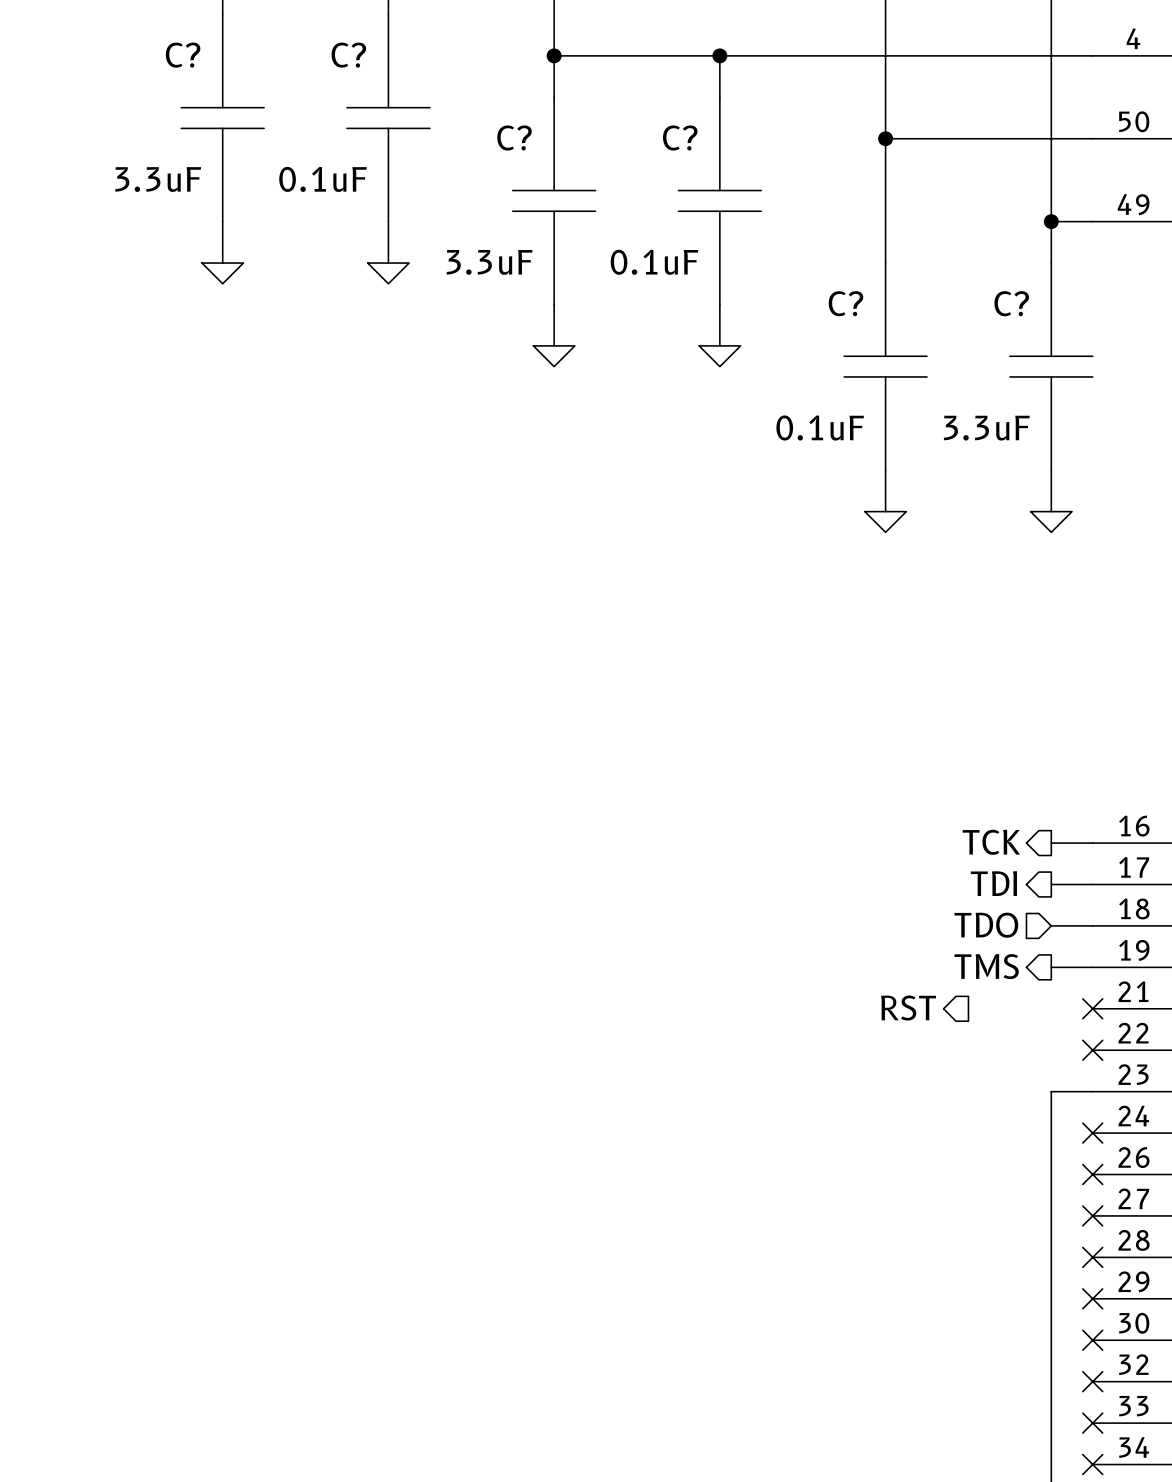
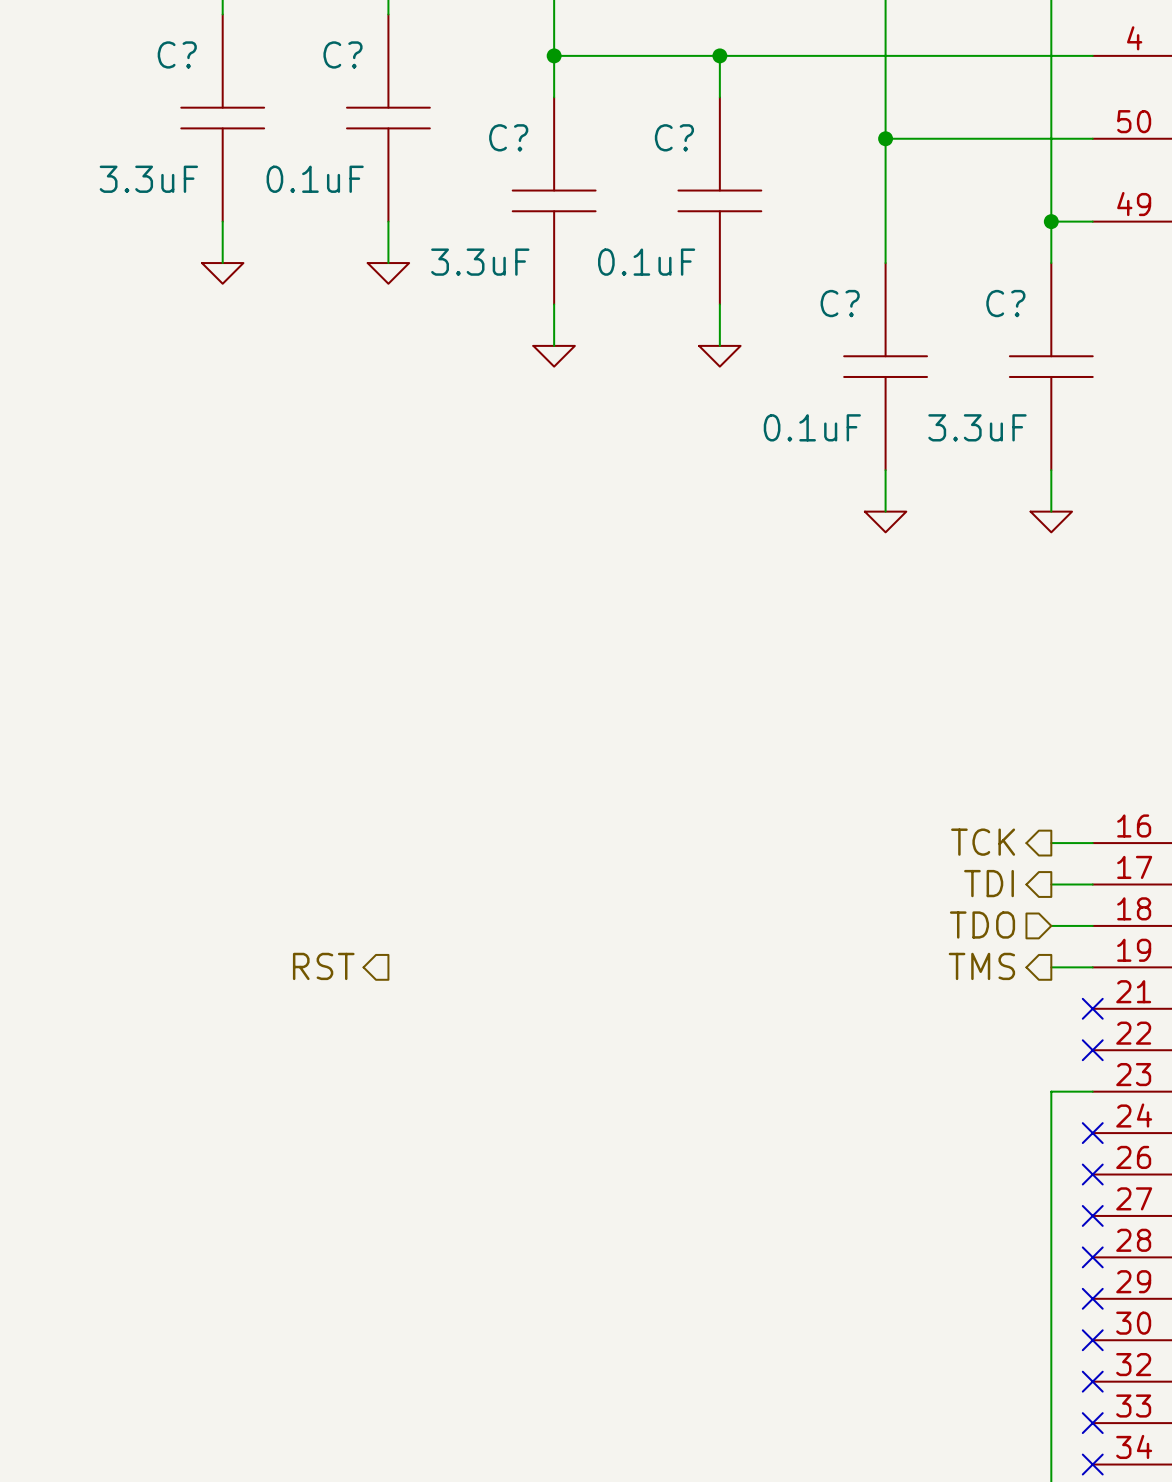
hierarchical label: none -> RST (323, 966)
hierarchical label: RST (908, 1008) -> none

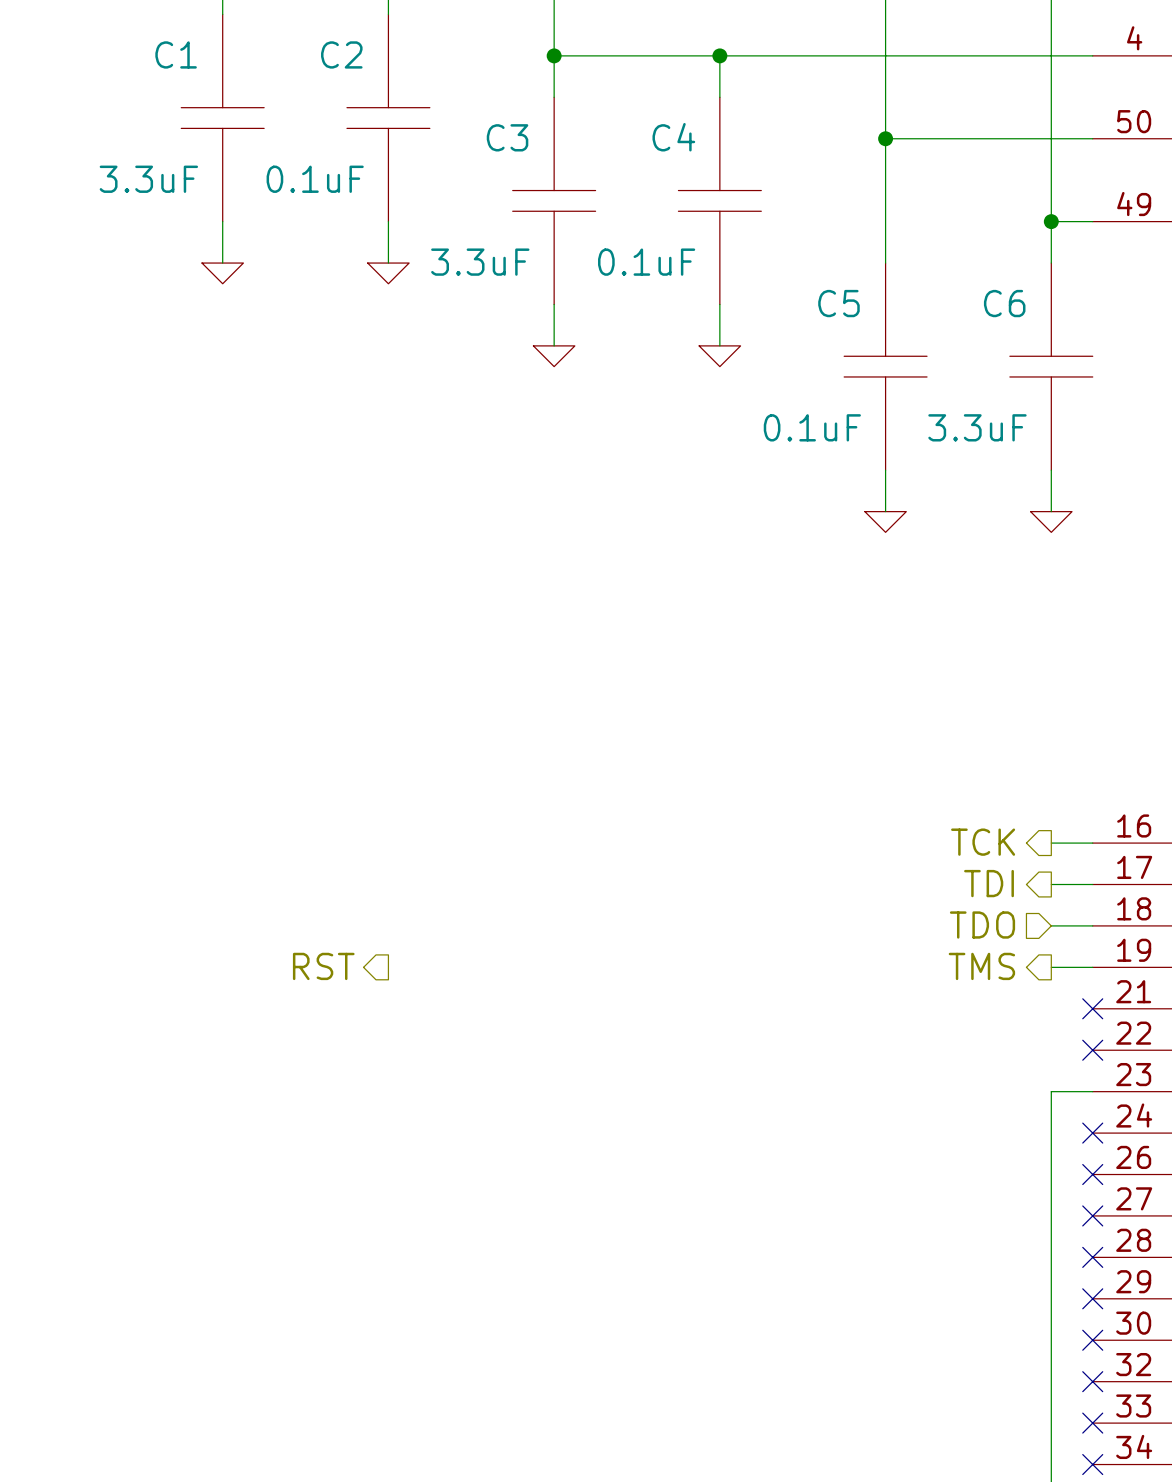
C? name: C? (177, 54) -> C1 (176, 54)
C? name: C? (342, 54) -> C2 (341, 54)
C? name: C? (508, 137) -> C3 (507, 137)
C? name: C? (674, 137) -> C4 (673, 137)
C? name: C? (840, 303) -> C5 (838, 303)
C? name: C? (1005, 303) -> C6 (1004, 303)

